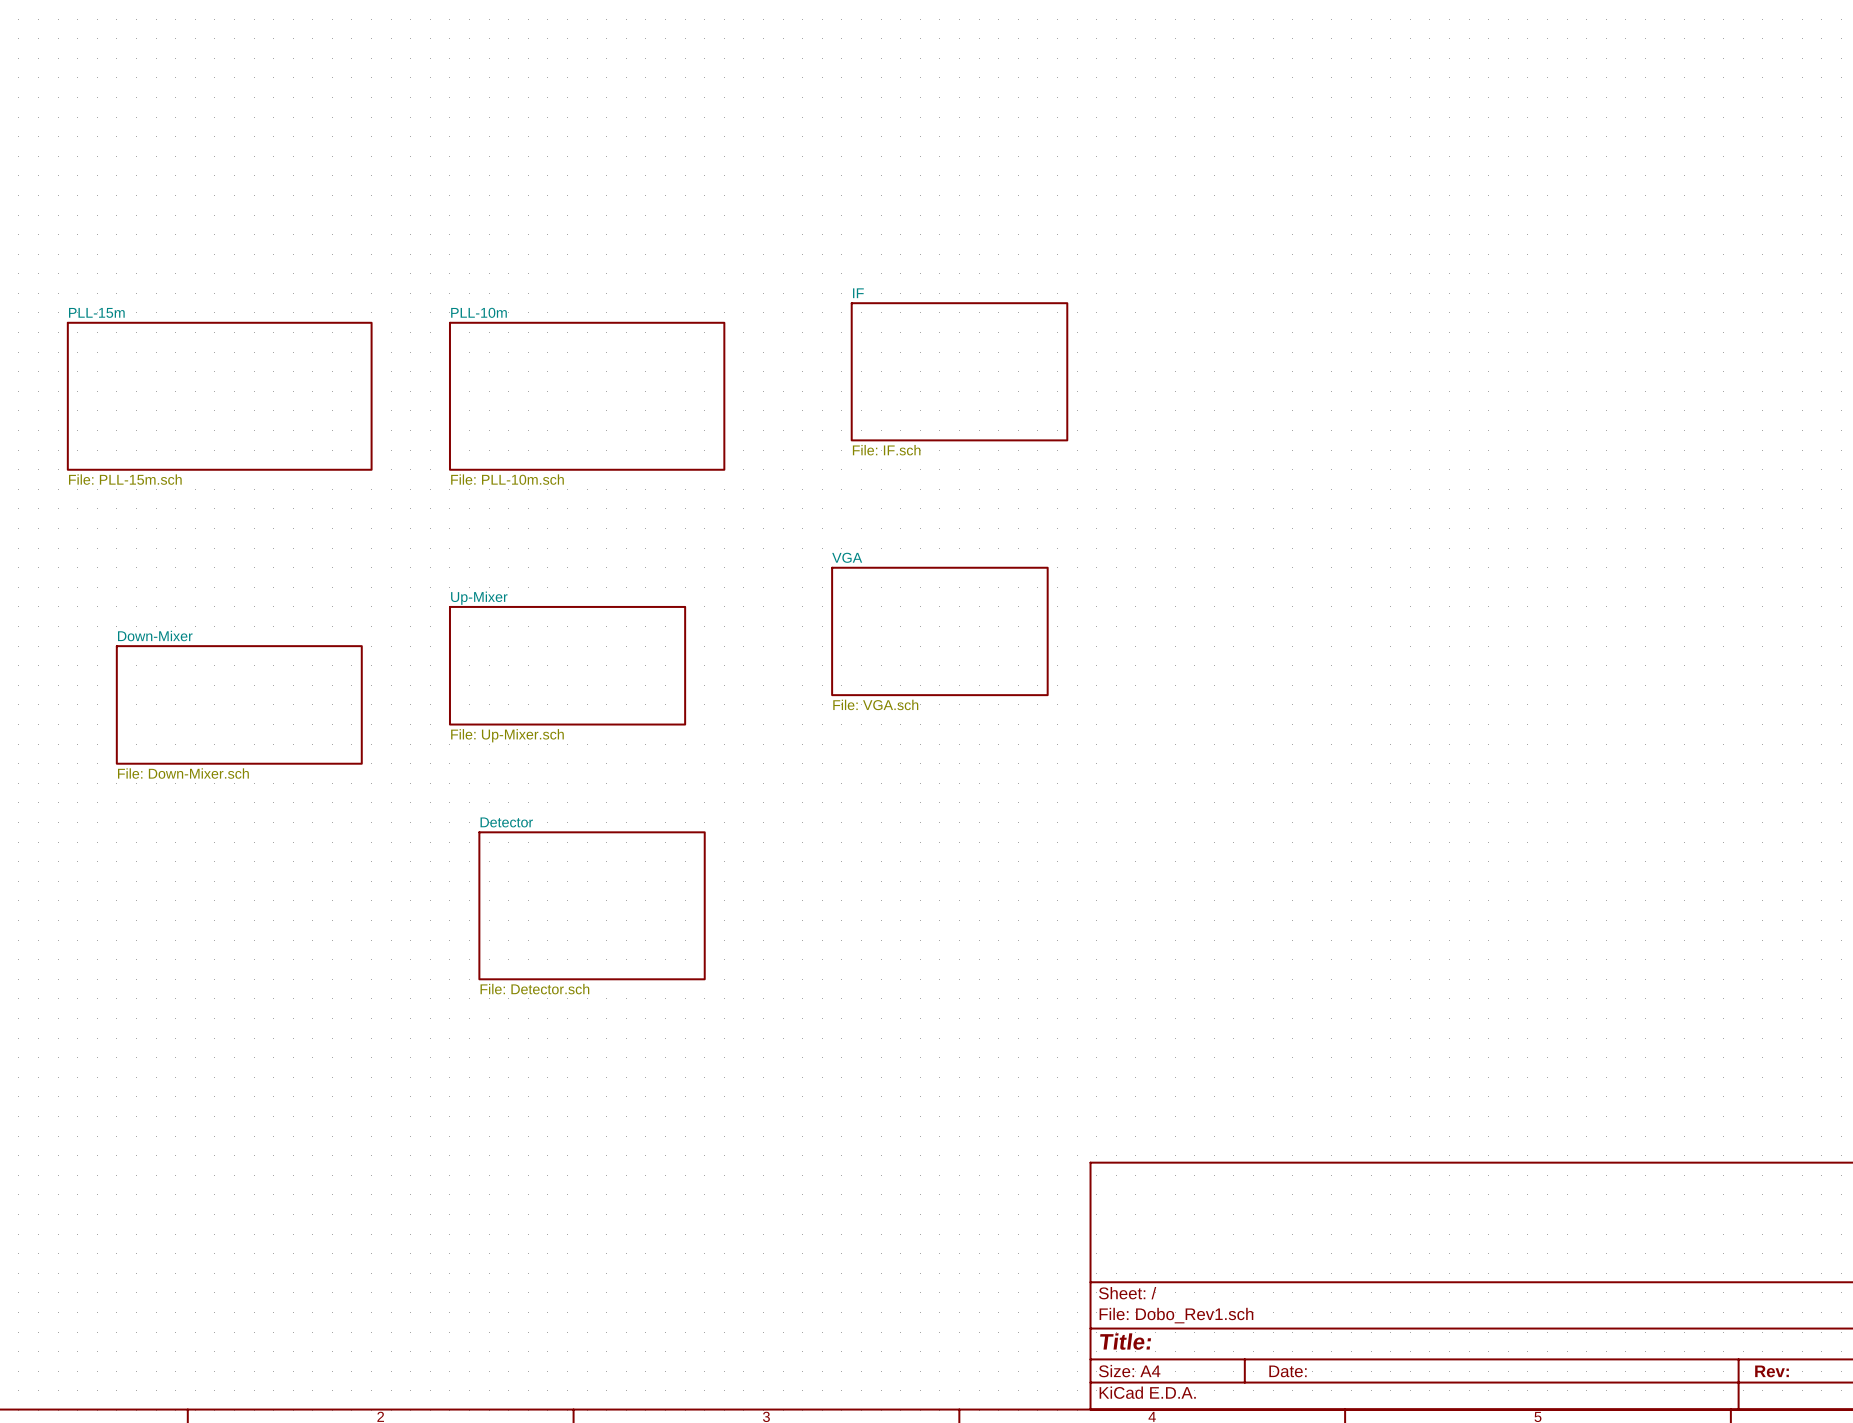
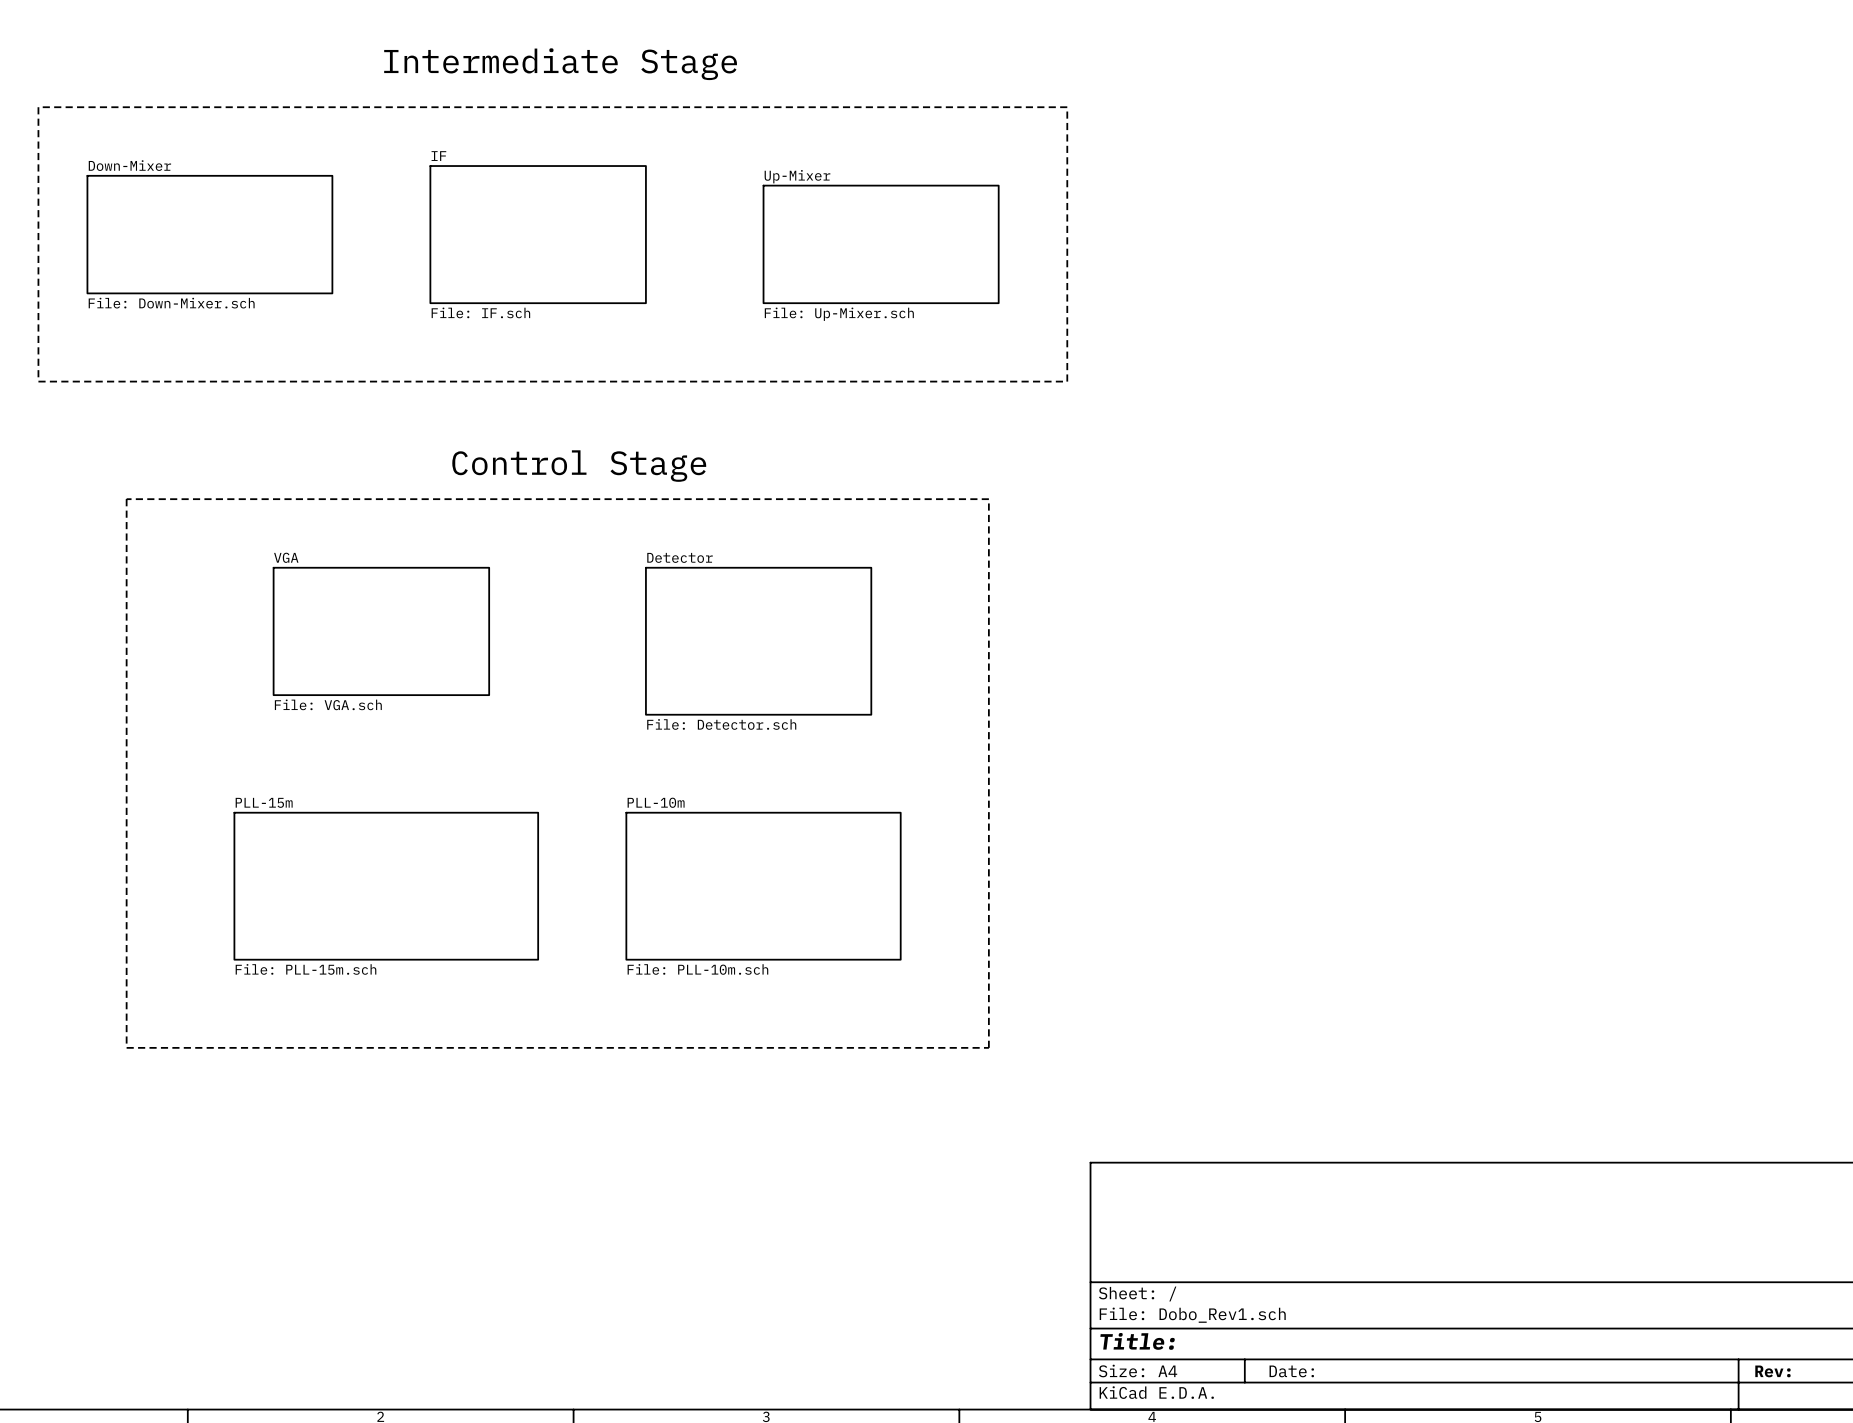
text: none -> Intermediate Stage (560, 64)
line: none -> (38, 107) (38, 381) (1067, 381) (1067, 107) (38, 107)
sheet Down-Mixer: none -> File: Down-Mixer.sch (209, 234)
sheet IF: none -> File: IF.sch (538, 234)
sheet Up-Mixer: none -> File: Up-Mixer.sch (881, 244)
sheet IF: File: IF.sch (959, 371) -> none
sheet PLL-15m position: (219, 396) -> (386, 886)
sheet PLL-10m position: (587, 396) -> (763, 886)
text: none -> Control Stage (579, 466)
line: none -> (126, 499) (988, 499) (988, 1047) (126, 1047) (126, 499)
sheet VGA: none -> File: VGA.sch (381, 631)
sheet VGA: File: VGA.sch (939, 631) -> none
sheet Detector: none -> File: Detector.sch (758, 641)
sheet Up-Mixer: File: Up-Mixer.sch (567, 665) -> none
sheet Down-Mixer: File: Down-Mixer.sch (239, 704) -> none
sheet Detector: File: Detector.sch (592, 905) -> none

